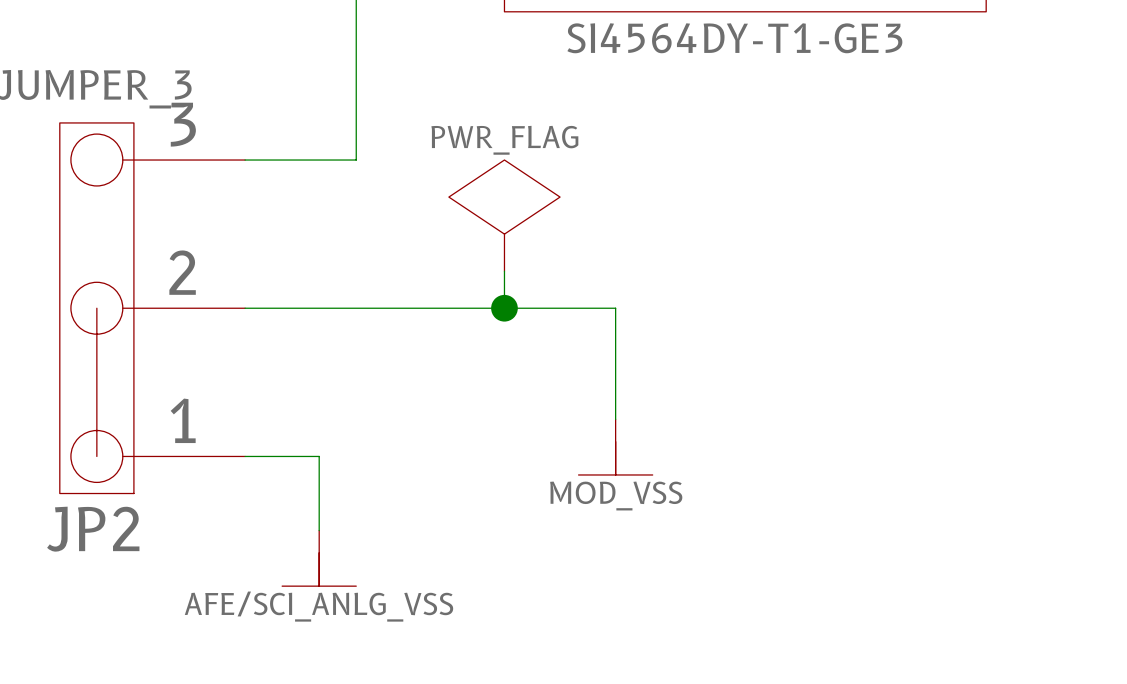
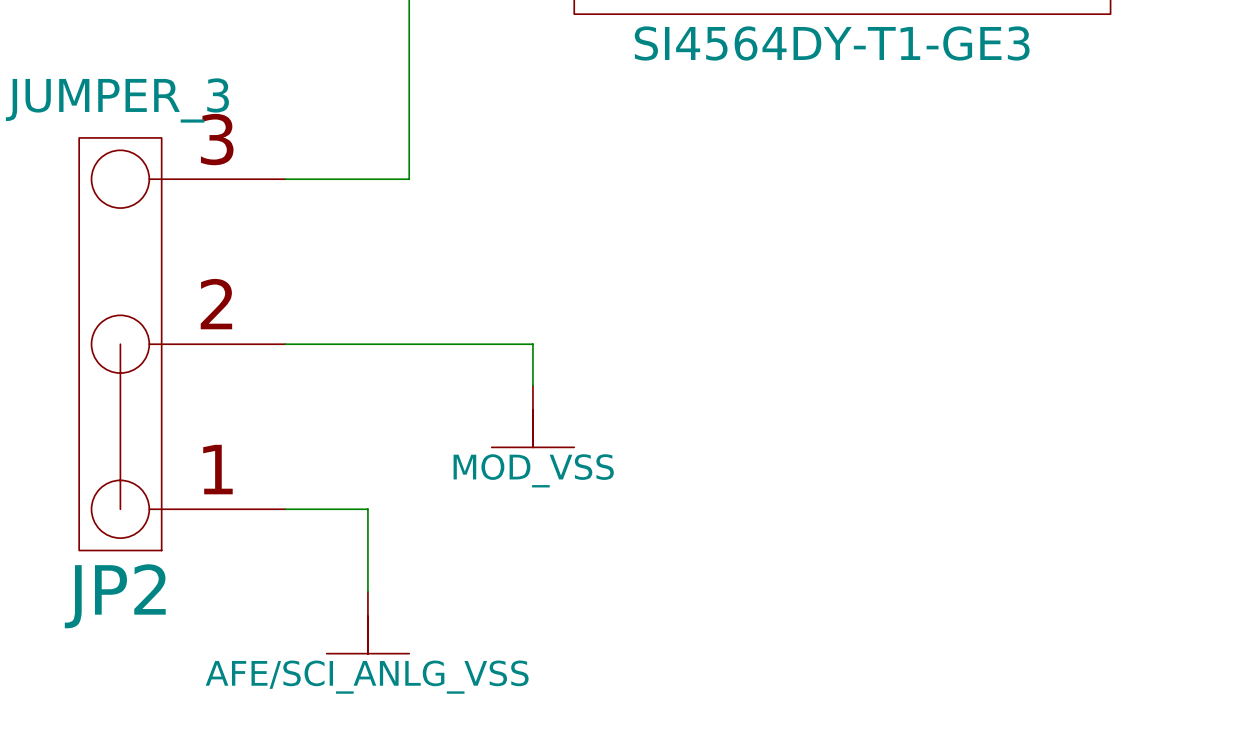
power symbol: PWR_FLAG (504, 215) -> none
wire: (504, 271) (504, 308) -> none
wire: (467, 308) (615, 308) (615, 419) -> (532, 344) (532, 385)
junction: (504, 308) -> none
power symbol position: MOD_VSS (615, 447) -> MOD_VSS (532, 416)

